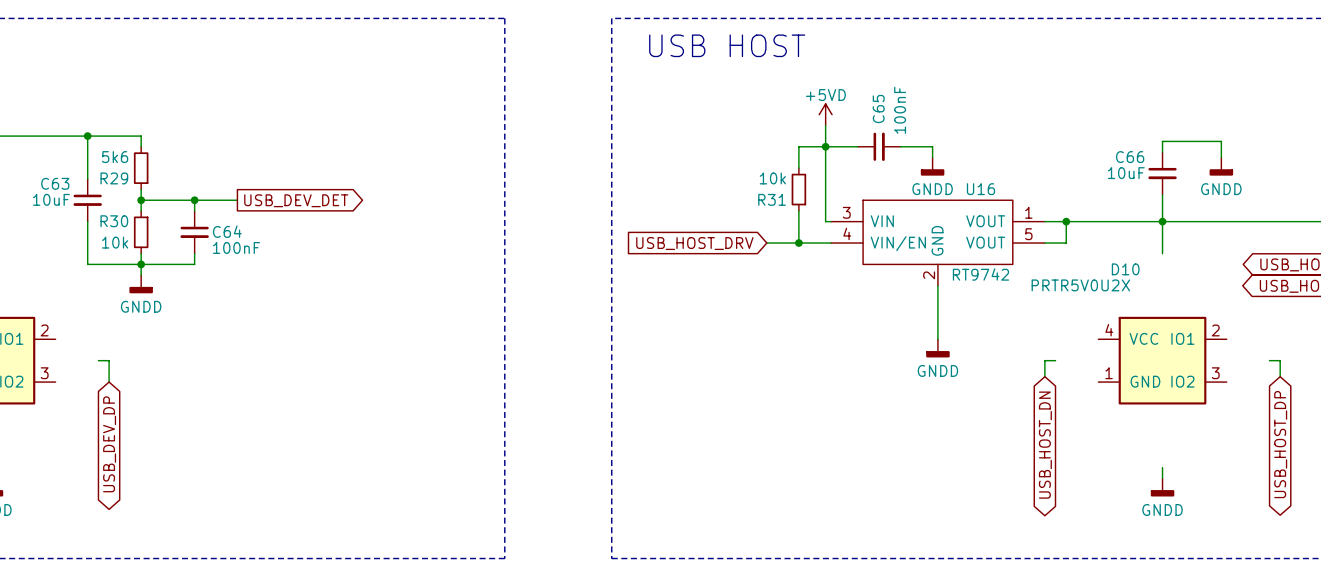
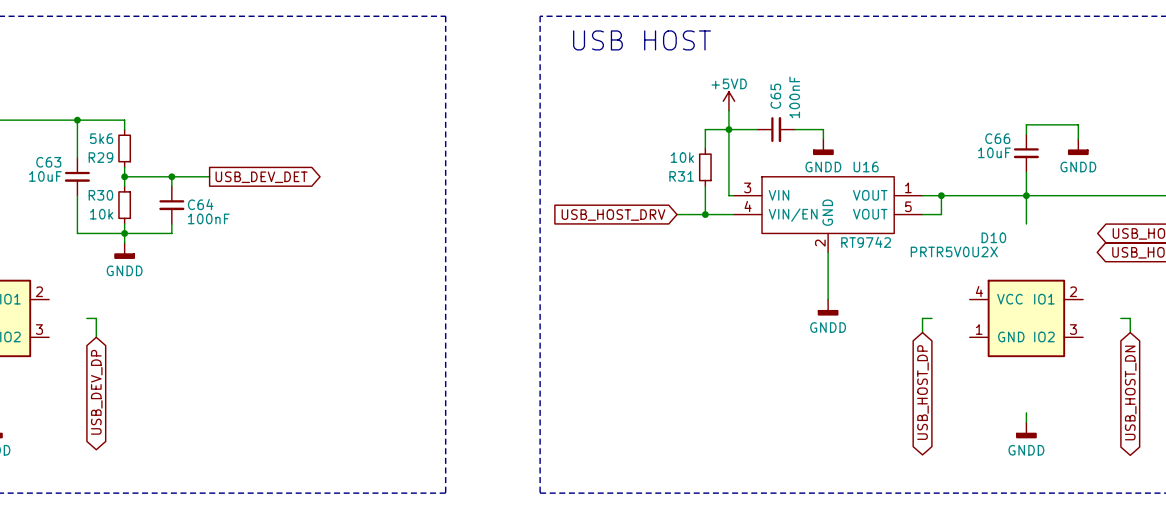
global label: USB_HOST_DP (1280, 444) -> USB_HOST_DN (1130, 392)
global label: USB_HOST_DN (1045, 445) -> USB_HOST_DP (922, 392)

